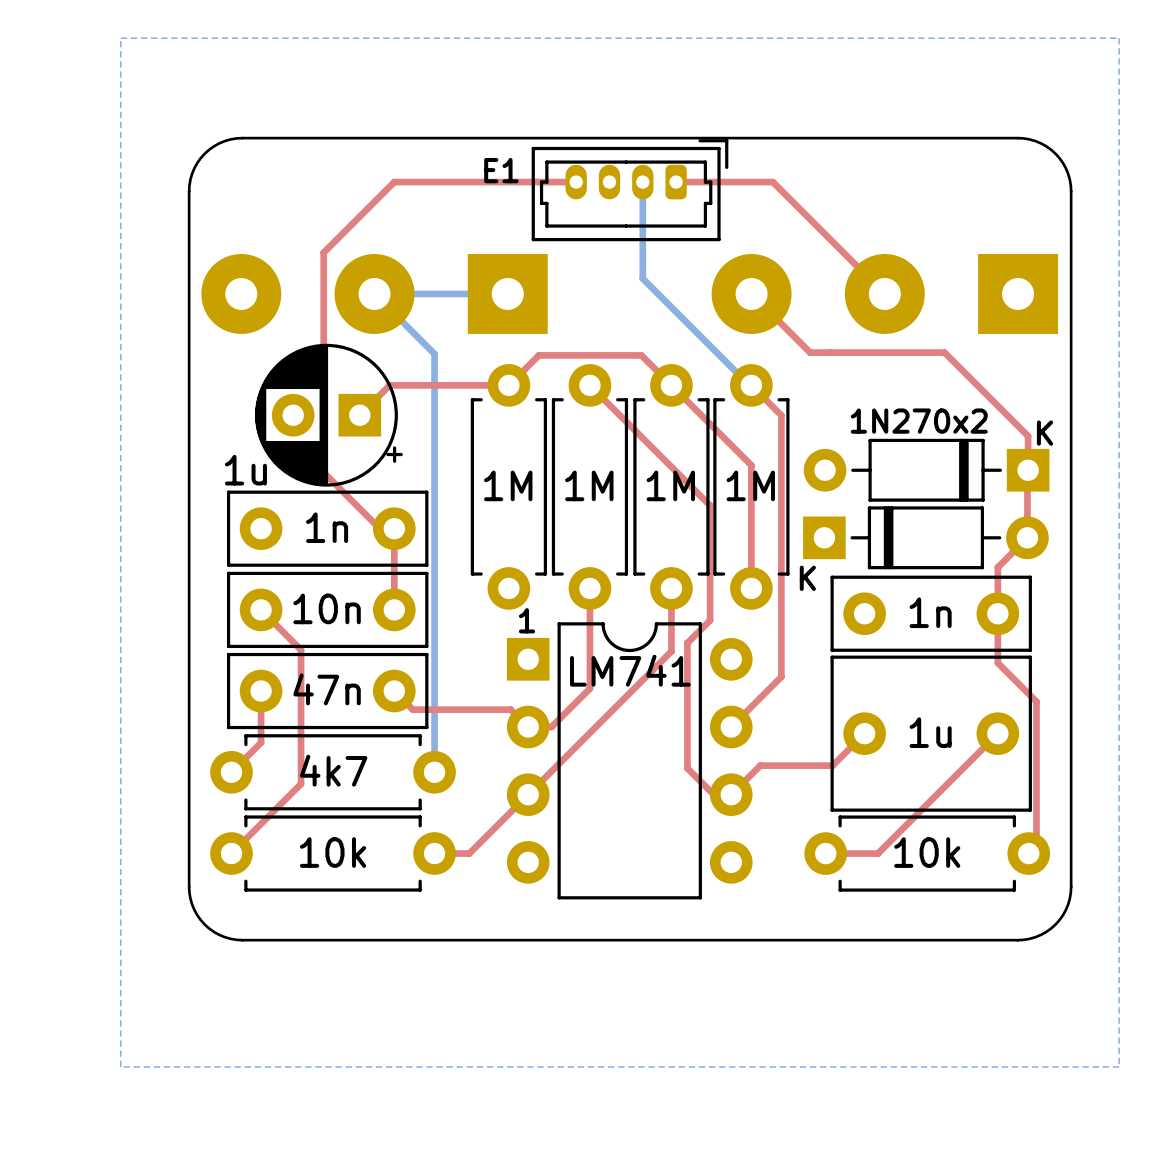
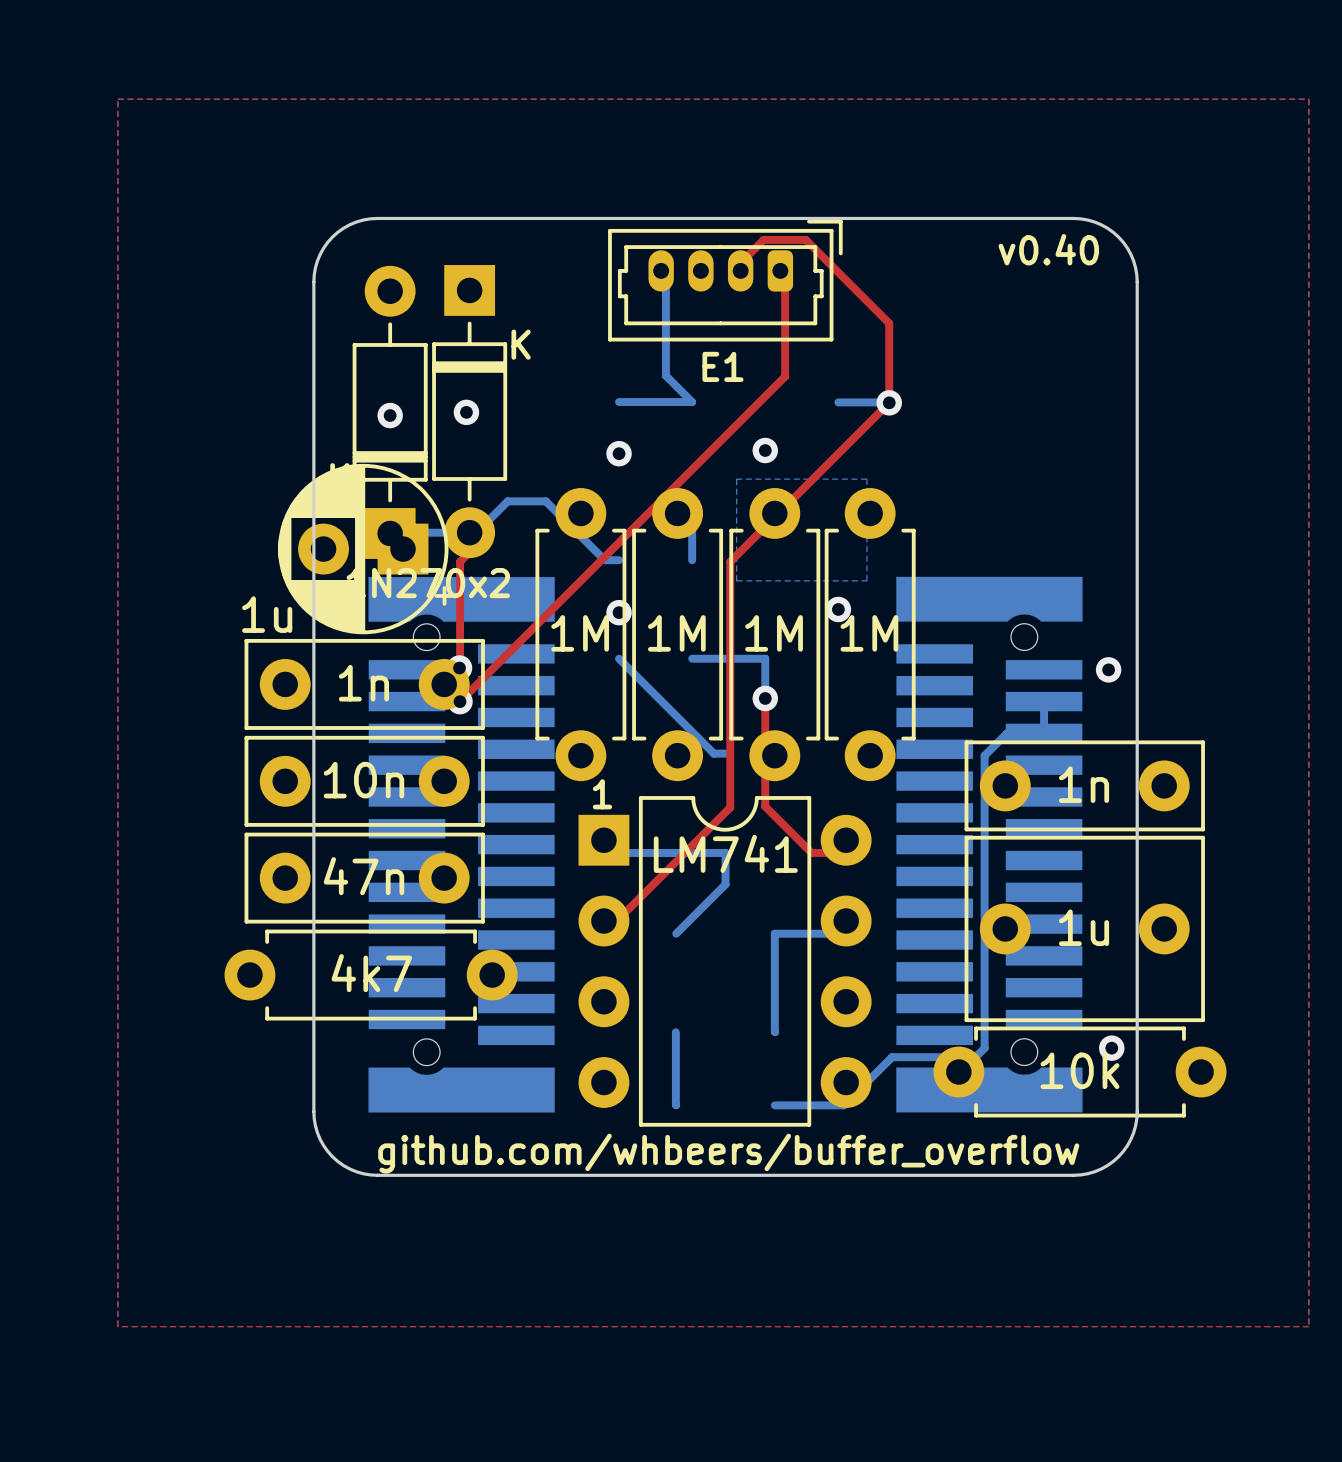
top zone outline: none -> (117, 99) (117, 1326) (1308, 1326) (1308, 99) (117, 99)
board edge: (338, 138) (242, 138) (224, 141) (214, 146) (200, 158) (192, 173) (189, 191) (190, 898) (194, 910) (204, 924) (214, 932) (230, 938) (338, 940) -> (377, 218) (356, 222) (343, 228) (332, 237) (323, 248) (317, 261) (313, 282) (314, 1118) (320, 1139) (327, 1151) (337, 1161) (356, 1171) (377, 1175)
board edge: (921, 138) (1017, 138) (1035, 141) (1051, 149) (1059, 158) (1068, 173) (1071, 191) (1069, 898) (1065, 910) (1055, 924) (1046, 932) (1029, 938) (921, 940) -> (1073, 218) (1094, 222) (1107, 228) (1118, 237) (1130, 254) (1135, 267) (1137, 282) (1136, 1118) (1130, 1139) (1118, 1156) (1101, 1169) (1087, 1173) (1073, 1175)
text: none -> v0.40 (1048, 249)
part value position: E1 (501, 170) -> E1 (722, 366)
top track: (576, 182) (394, 182) (323, 252) (323, 472) (379, 528) (394, 528) (394, 609) -> none
bottom track: none -> (665, 270) (665, 375) (692, 402) (619, 402)
bottom track: (642, 182) (642, 278) (751, 385) -> none
top track: none -> (745, 270) (745, 258) (763, 239) (805, 239) (889, 323) (889, 402) (730, 561) (730, 807) (604, 933)
top track: (676, 182) (772, 182) (884, 293) -> none
top track: none -> (785, 270) (785, 376) (460, 701)
bottom track: none -> (838, 402) (888, 402)
via: none -> (889, 402)
part: (374, 293) -> none
bottom track: (507, 293) (374, 293) (434, 354) (434, 772) -> none
top track: (751, 293) (810, 352) (944, 352) (1028, 436) (1027, 537) (997, 567) (997, 663) (1036, 701) (1036, 846) (1028, 853) -> none
part: (884, 293) -> none
part: none -> (469, 411)
part: none -> (390, 412)
via: none -> (466, 412)
via: none -> (390, 415)
via: none -> (765, 450)
via: none -> (619, 453)
bottom zone outline: none -> (736, 479) (867, 479) (867, 580) (736, 580) (736, 479)
bottom track: none -> (692, 501) (692, 560)
top track: (589, 385) (710, 505) (710, 620) (687, 643) (687, 768) (713, 794) (731, 794) (760, 765) (832, 765) (864, 733) -> none
top track: (751, 385) (781, 415) (781, 676) (731, 726) -> none
top track: none -> (469, 532) (469, 552) (460, 561) (459, 668)
bottom track: none -> (390, 533) (476, 532) (507, 501) (545, 501) (604, 560) (619, 560)
top track: (359, 415) (389, 385) (508, 385) (538, 355) (641, 355) (751, 465) (751, 588) -> none
via: none -> (838, 609)
via: none -> (619, 612)
part: (926, 470) -> none
bottom track: none -> (619, 658) (713, 753) (725, 753)
bottom track: none -> (692, 658) (765, 658) (765, 698)
via: none -> (459, 668)
via: none -> (1108, 669)
part: (925, 537) -> none
top track: none -> (765, 698) (765, 806) (811, 852) (846, 852)
via: none -> (765, 698)
via: none -> (460, 701)
bottom track: none -> (1044, 701) (1044, 733) (1006, 733) (984, 755) (984, 1048) (975, 1057) (892, 1057) (843, 1105) (774, 1105)
top track: (589, 588) (589, 688) (551, 726) (528, 726) (510, 709) (412, 709) (394, 691) -> none
top track: (671, 588) (671, 651) (469, 853) (434, 853) -> none
top track: (261, 609) (301, 649) (301, 783) (231, 853) -> none
part: none -> (989, 844)
part: none -> (461, 844)
bottom track: none -> (604, 852) (725, 852) (725, 884) (676, 933)
top track: (261, 691) (261, 742) (231, 772) -> none
top track: (997, 733) (877, 853) (825, 853) -> none
bottom track: none -> (846, 933) (774, 933) (774, 1031)
bottom track: none -> (675, 1032) (675, 1104)
via: none -> (1111, 1048)
part: 10k (333, 853) -> none
text: none -> github.com/whbeers/buffer_overflow (728, 1153)

